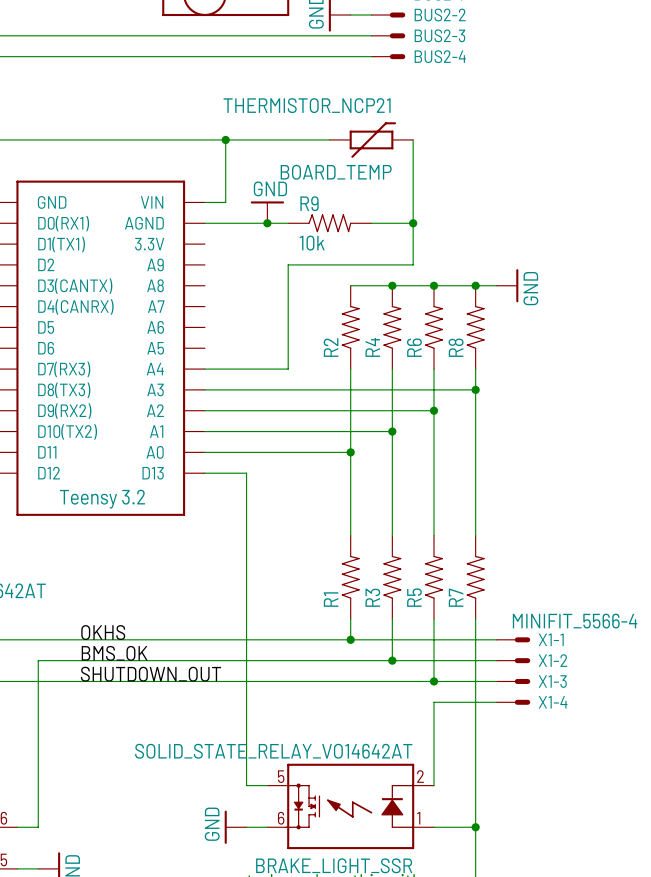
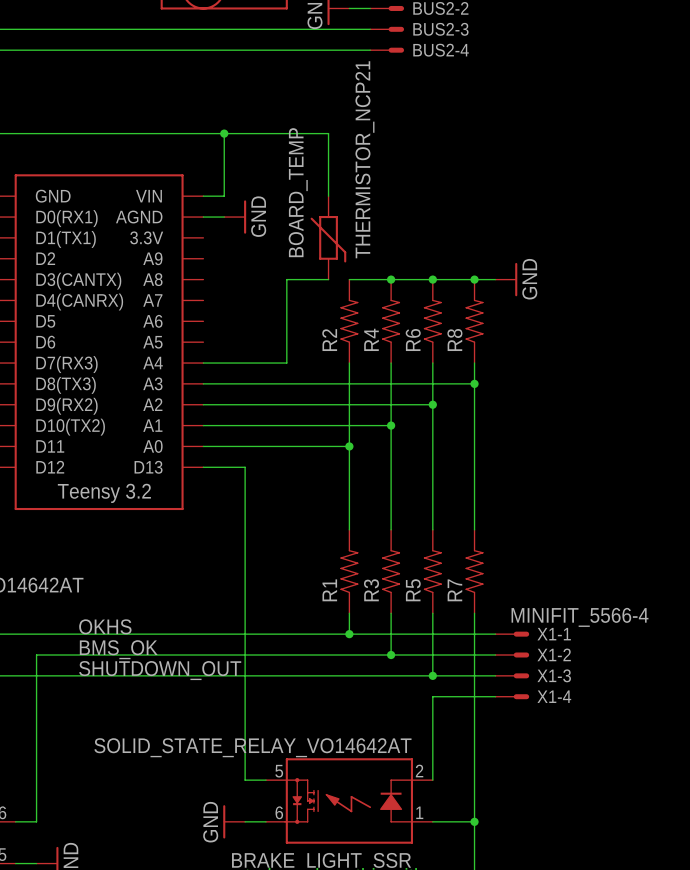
wire: none -> (328, 133) (328, 196)
wire: (413, 139) (413, 264) (288, 264) (288, 285) -> (328, 279) (286, 279)
BOARD_TEMP position: (371, 140) -> (328, 237)
BOARD_TEMP rotation: 0° (372, 140) -> 90° clockwise (328, 239)
power symbol rotation: 0° (267, 202) -> 90° clockwise (245, 217)
power symbol position: GND (267, 212) -> GND (235, 217)
wire: (225, 223) (288, 223) -> none
junction: (267, 223) -> none
R9: 10k (329, 223) -> none
wire: (371, 223) (413, 223) -> none
junction: (413, 223) -> none

